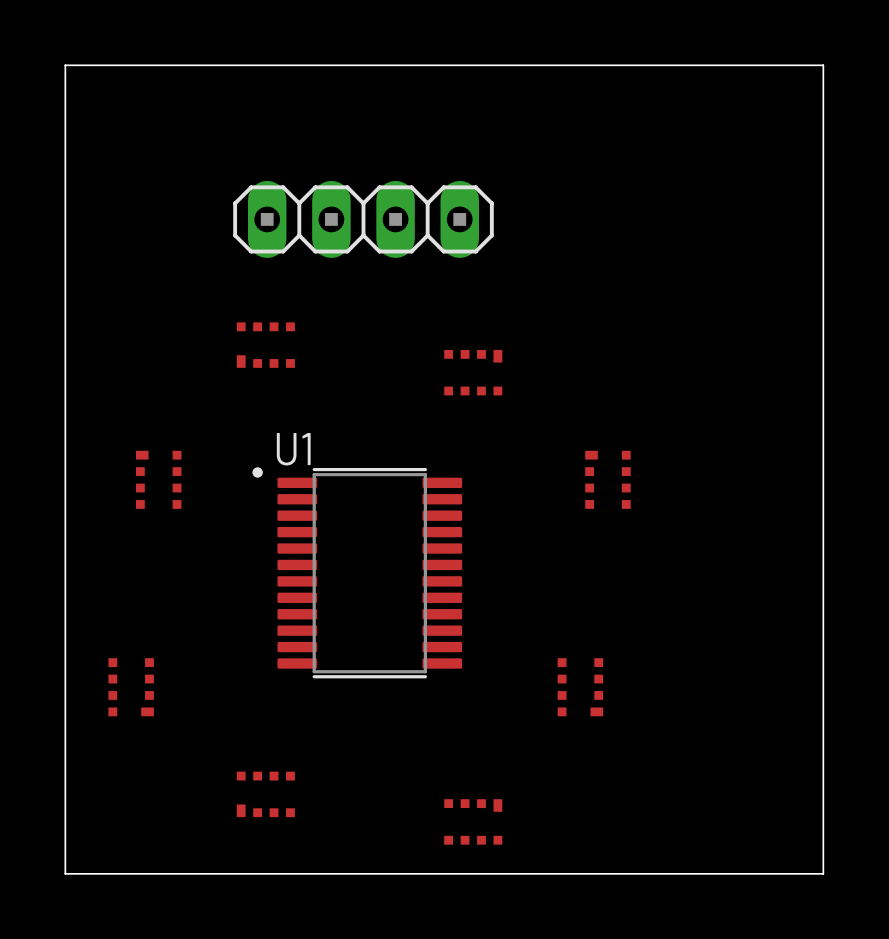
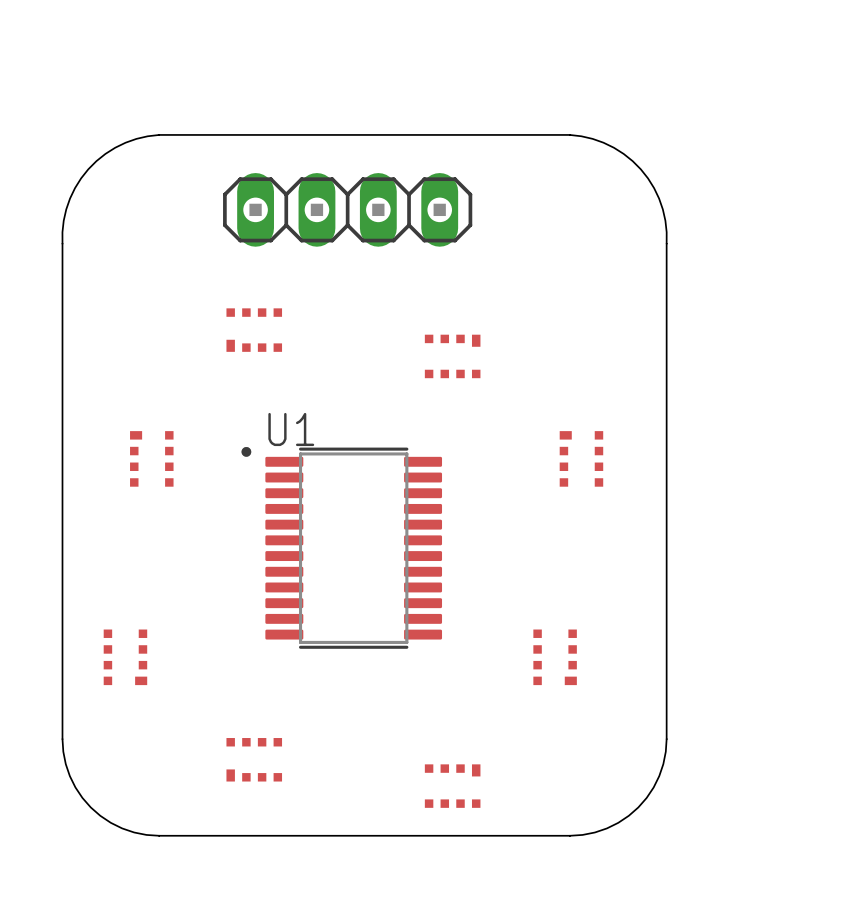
board edge: (65, 254) (65, 65) (823, 65) (823, 873) (595, 873) -> (62, 243) (66, 209) (81, 178) (105, 153) (125, 142) (147, 136) (569, 134) (603, 142) (623, 153) (640, 169) (659, 198) (666, 232) (665, 751) (663, 764) (653, 787) (638, 807) (618, 822) (606, 828) (582, 834) (569, 835)
board edge: (65, 772) (65, 873) (166, 873) -> (62, 739) (63, 751) (69, 776) (75, 787) (90, 807) (110, 822) (122, 828) (146, 834) (159, 835)

